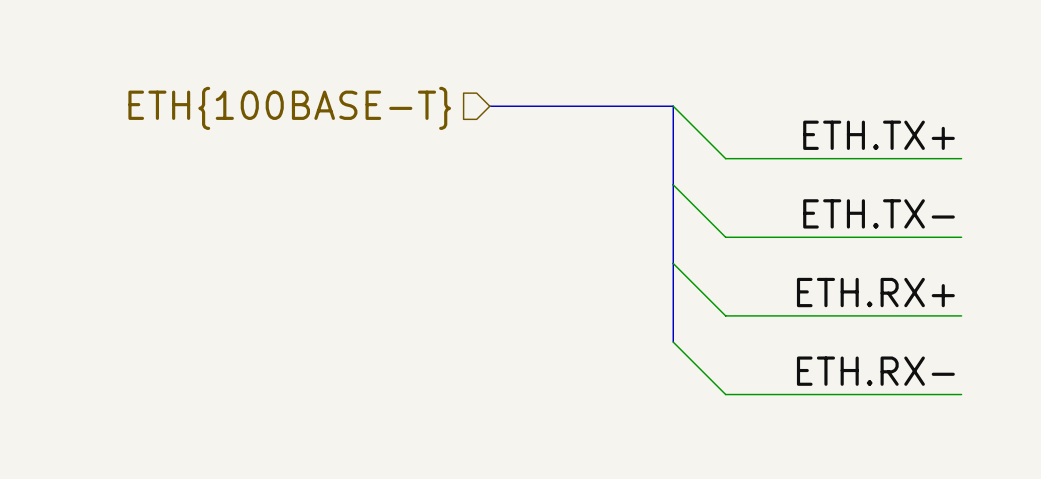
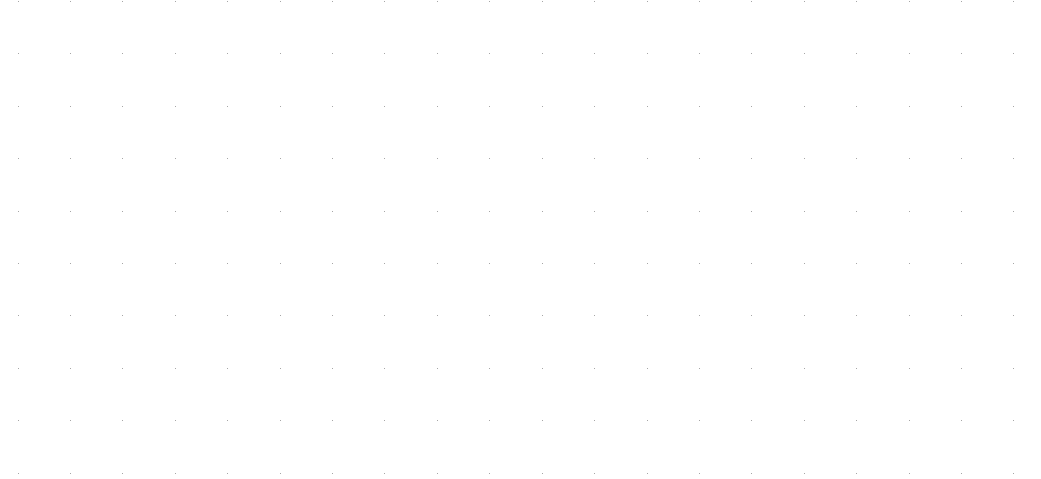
bus: (489, 106) (673, 106) (673, 342) -> none
wire: (673, 106) (725, 158) (961, 158) -> none
hierarchical label: ETH{100BASE-T} (289, 108) -> none
label: ETH.TX+ (879, 135) -> none
wire: (673, 184) (725, 237) (961, 237) -> none
label: ETH.TX- (879, 213) -> none
wire: (673, 263) (725, 315) (961, 315) -> none
label: ETH.RX+ (875, 292) -> none
wire: (673, 342) (725, 394) (961, 394) -> none
label: ETH.RX- (875, 371) -> none

